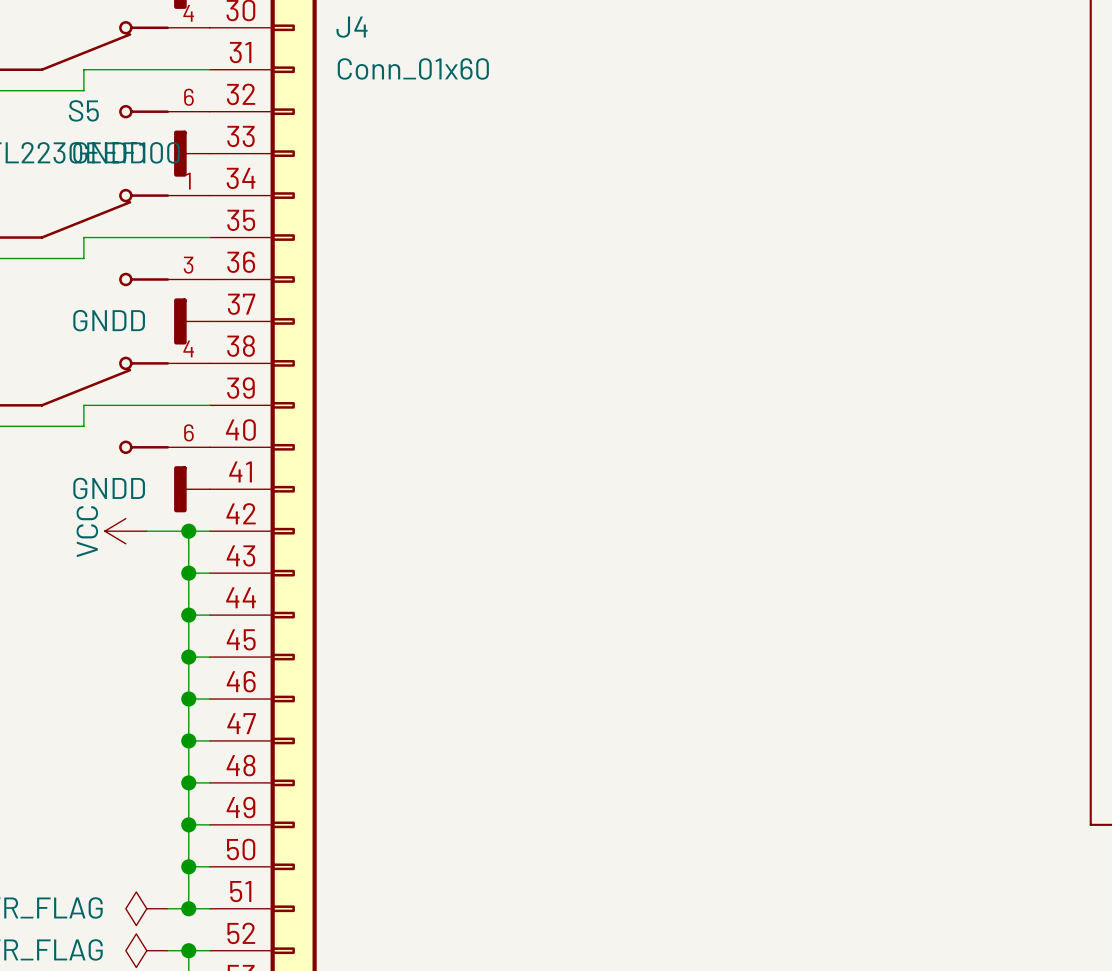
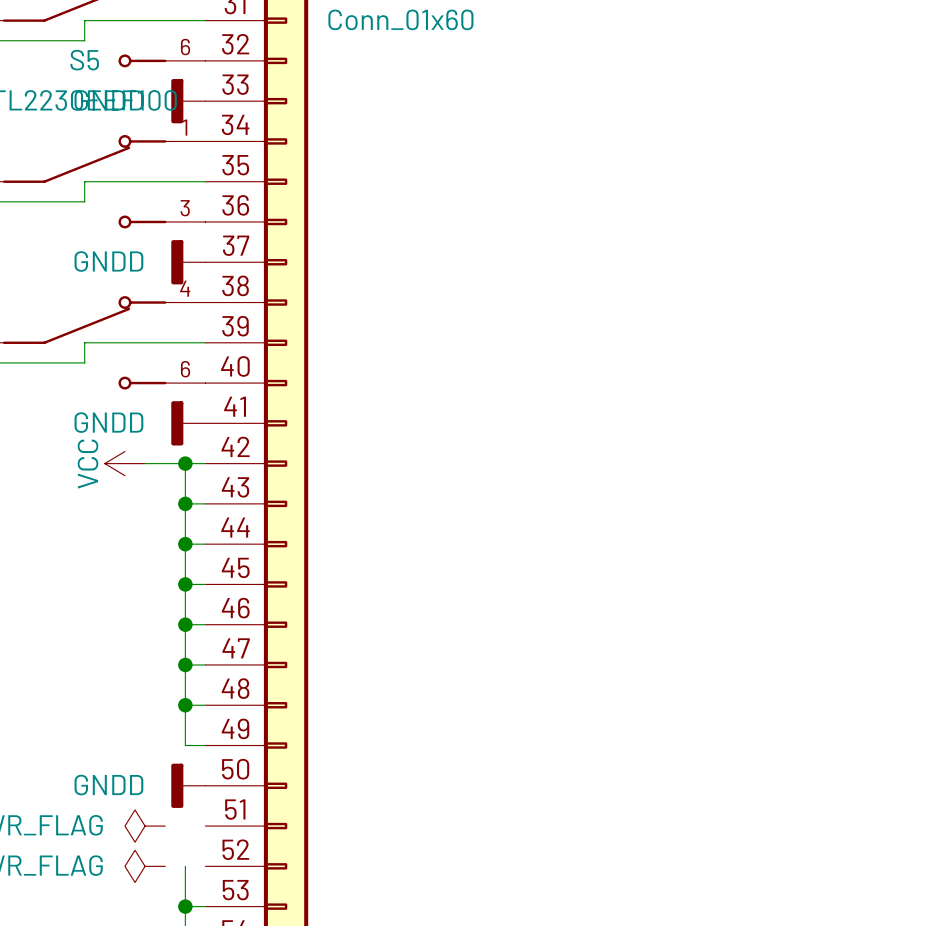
wire: (188, 824) (188, 908) -> none
junction: (188, 824) -> none
junction: (188, 866) -> none
power symbol: none -> GNDD (188, 785)
wire: (167, 908) (209, 908) -> none
junction: (188, 908) -> none
wire: (167, 950) (209, 950) -> none
junction: (188, 950) -> none

